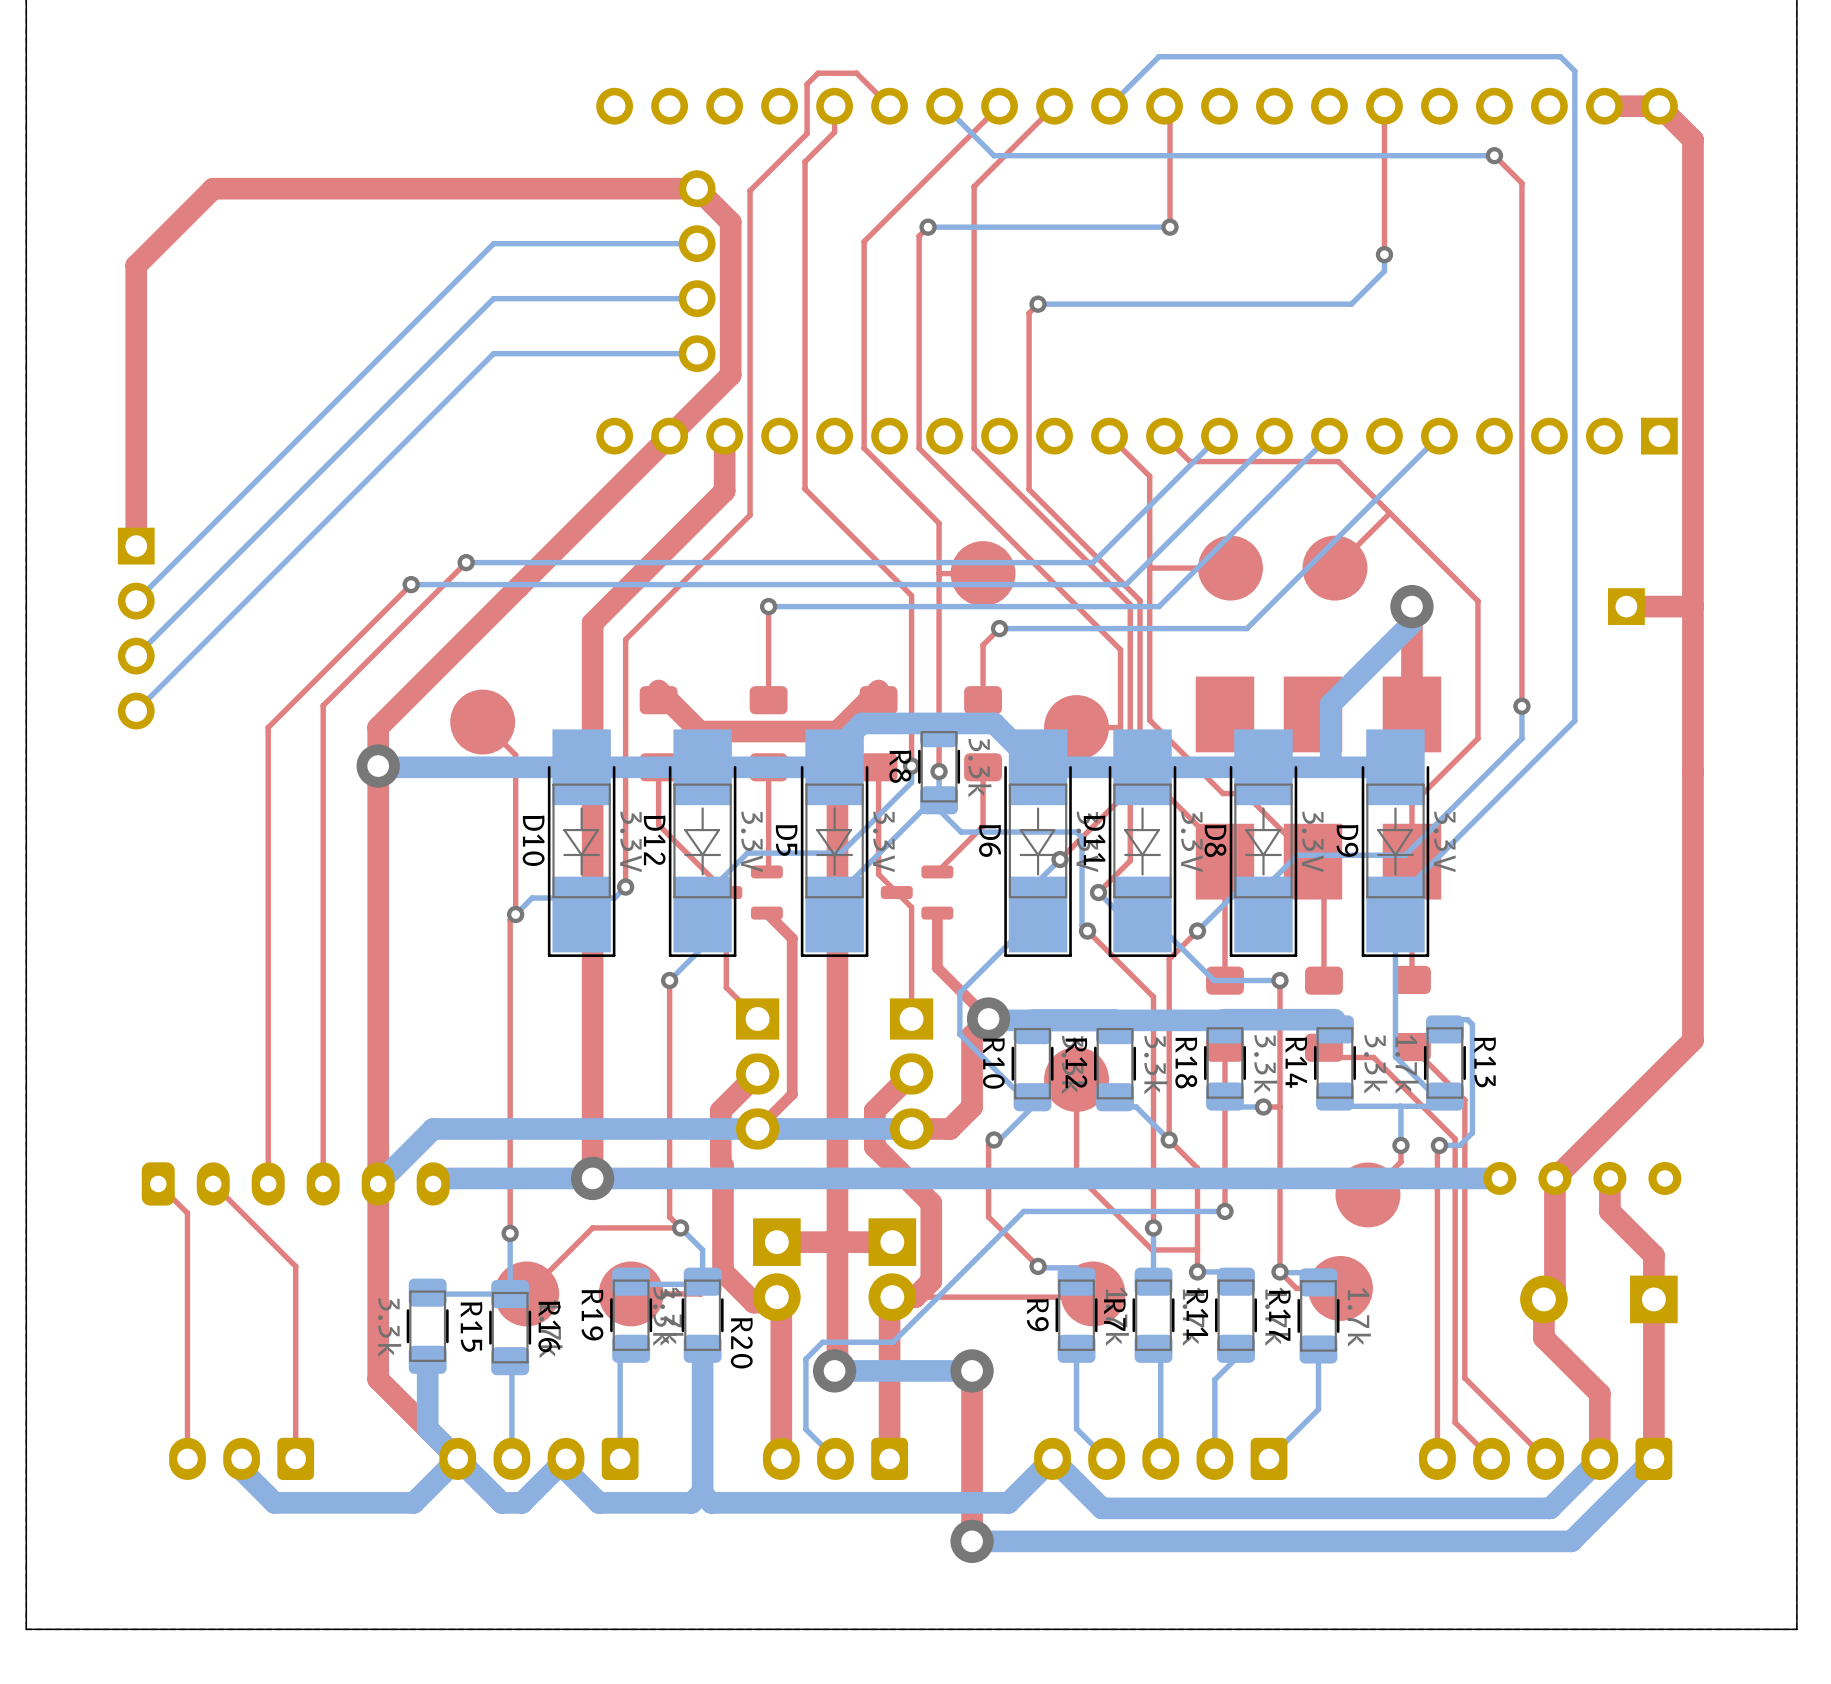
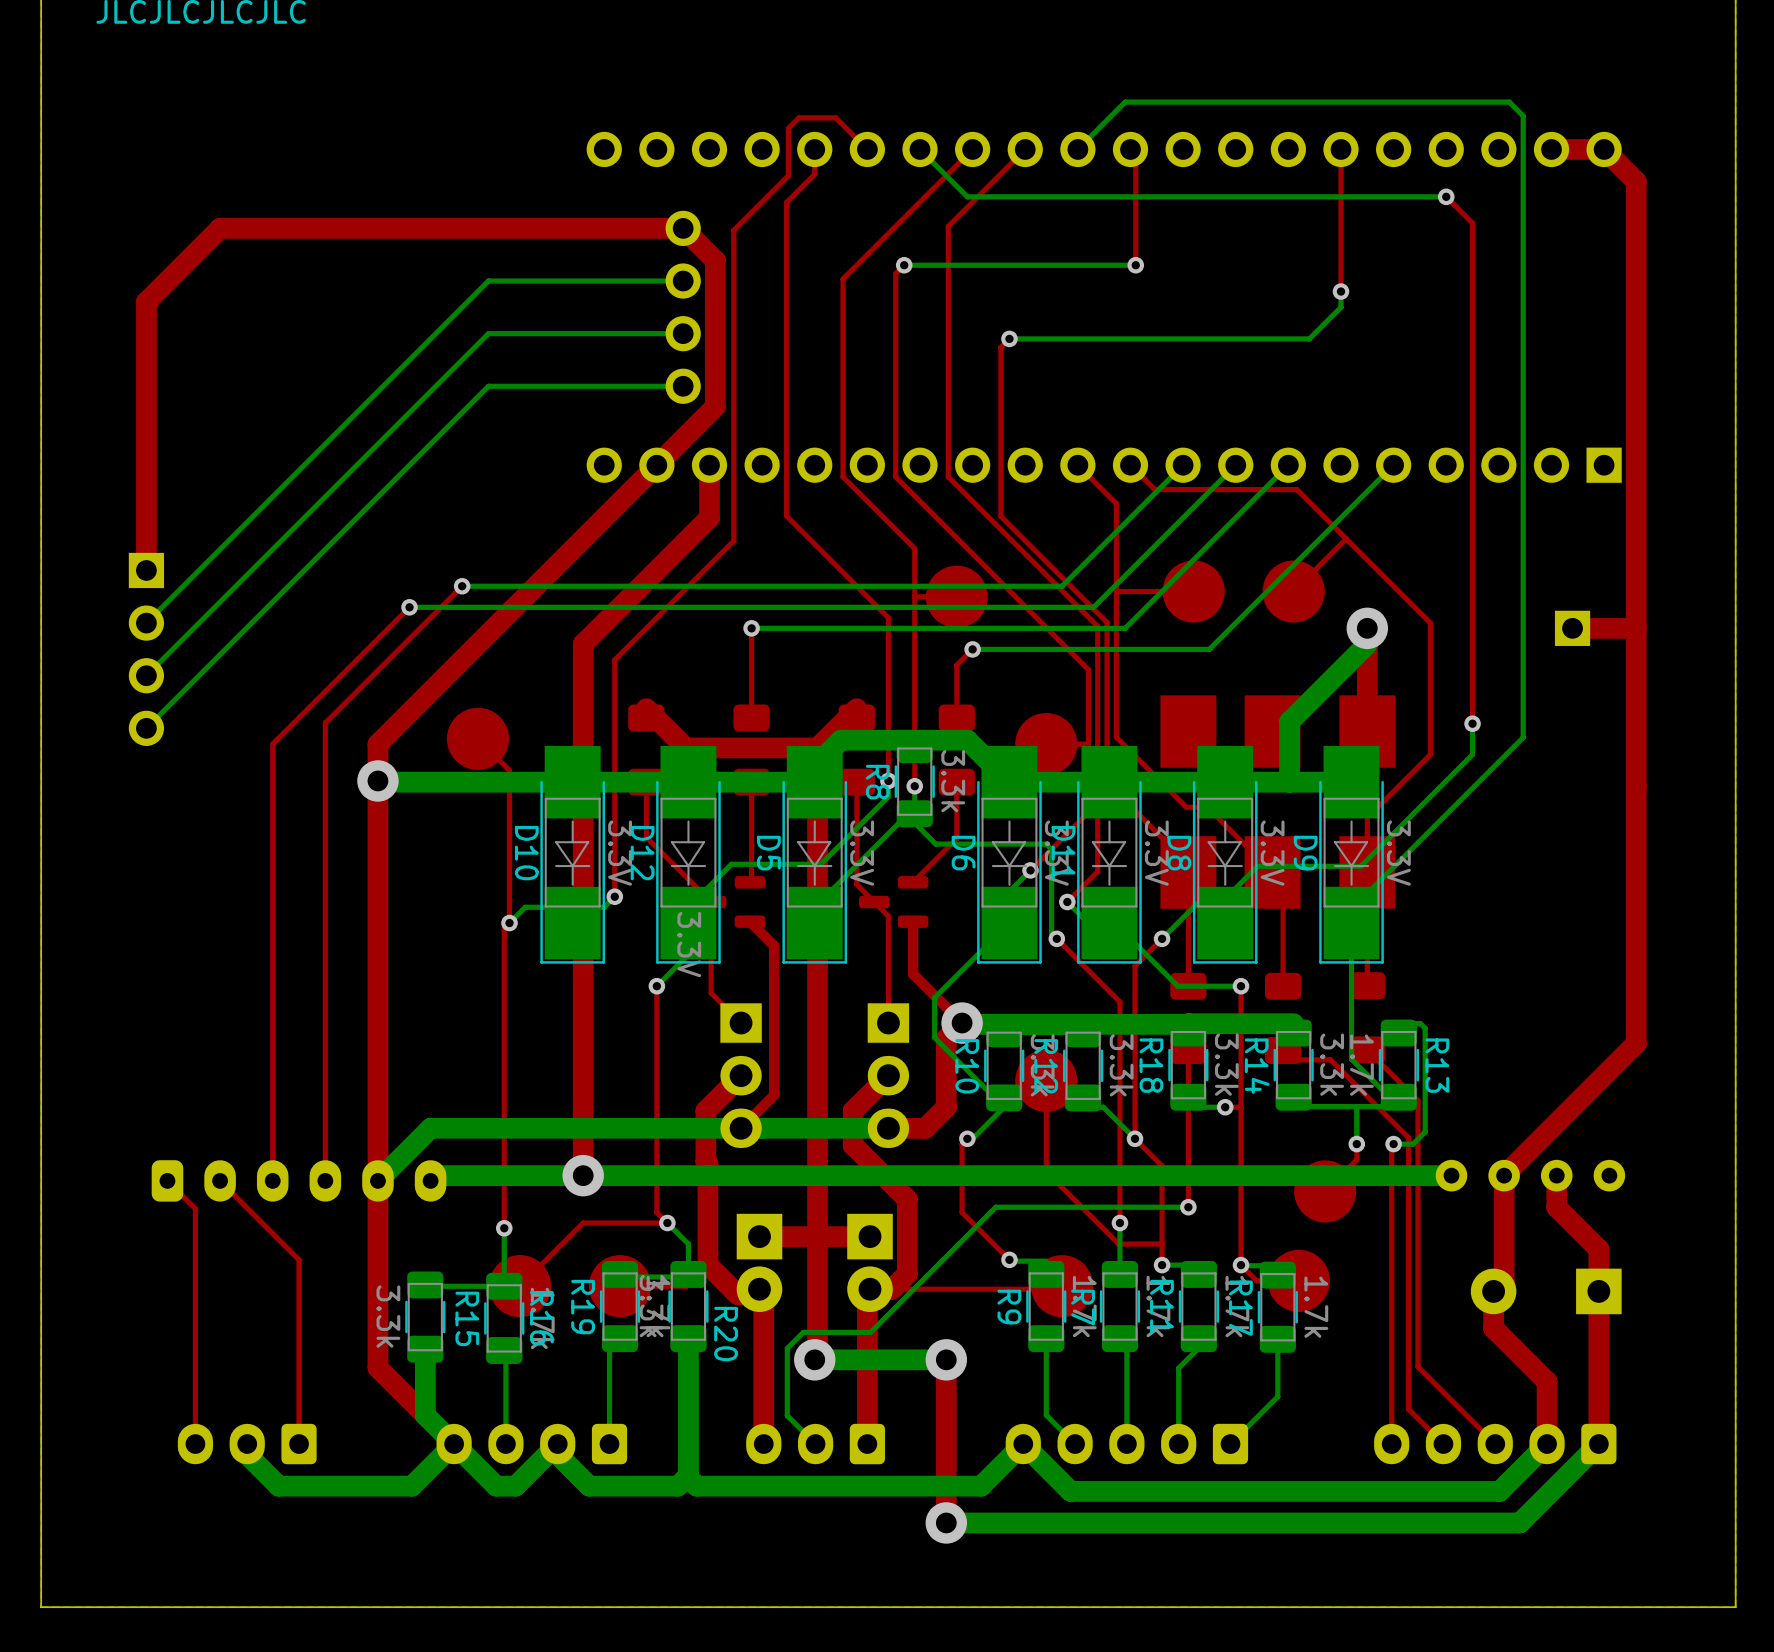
D12 value position: 3.3V (751, 841) -> 3.3V (689, 944)

